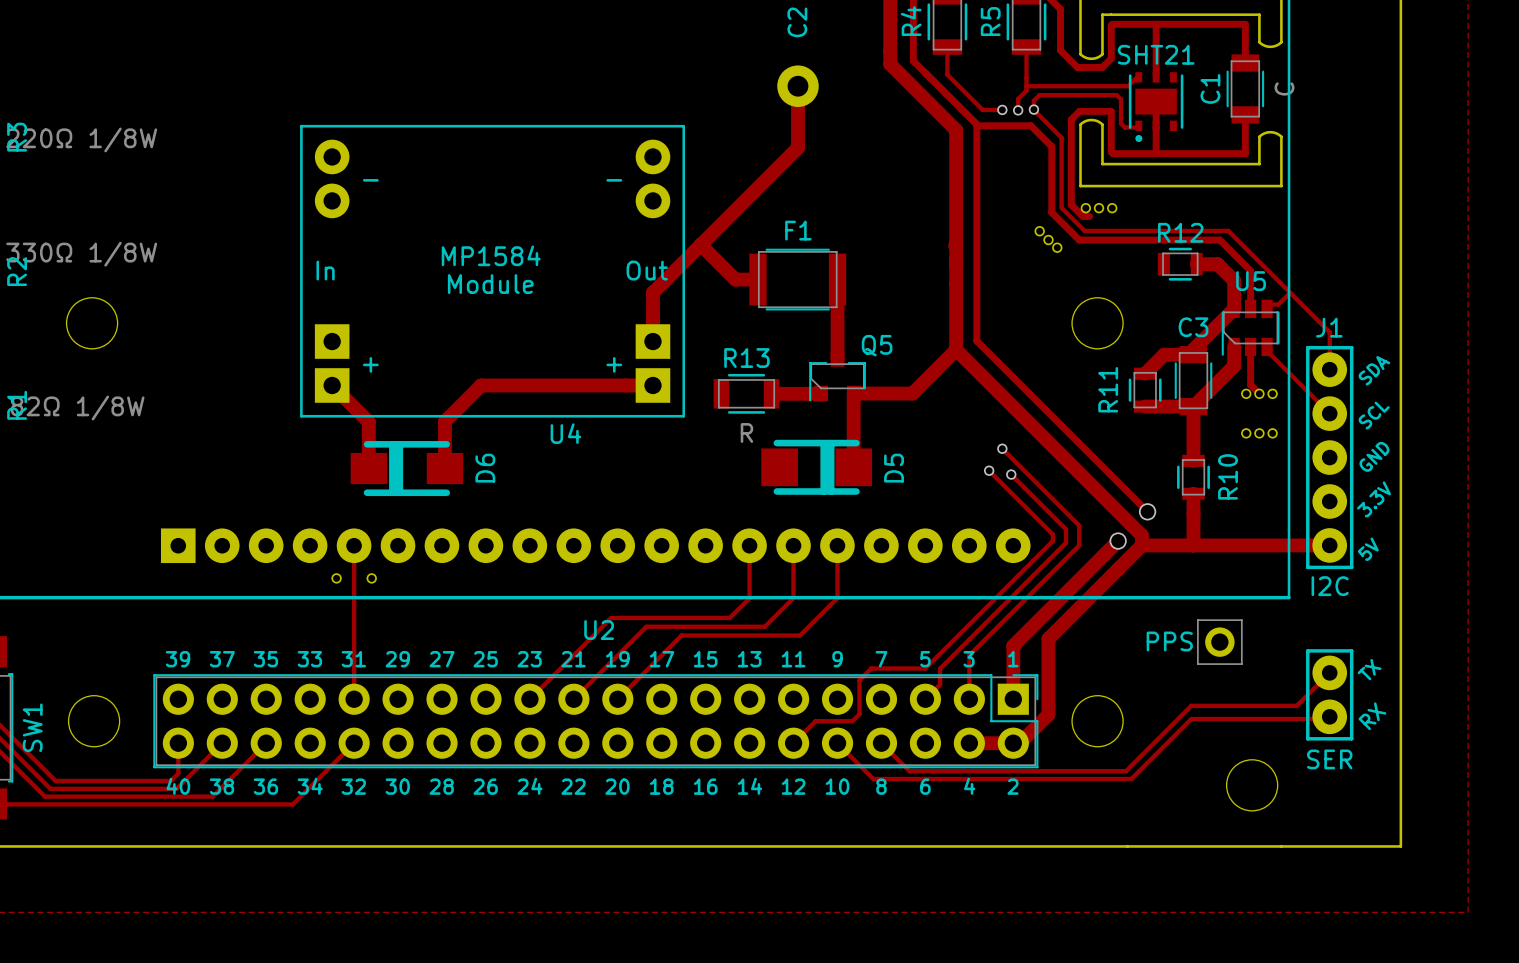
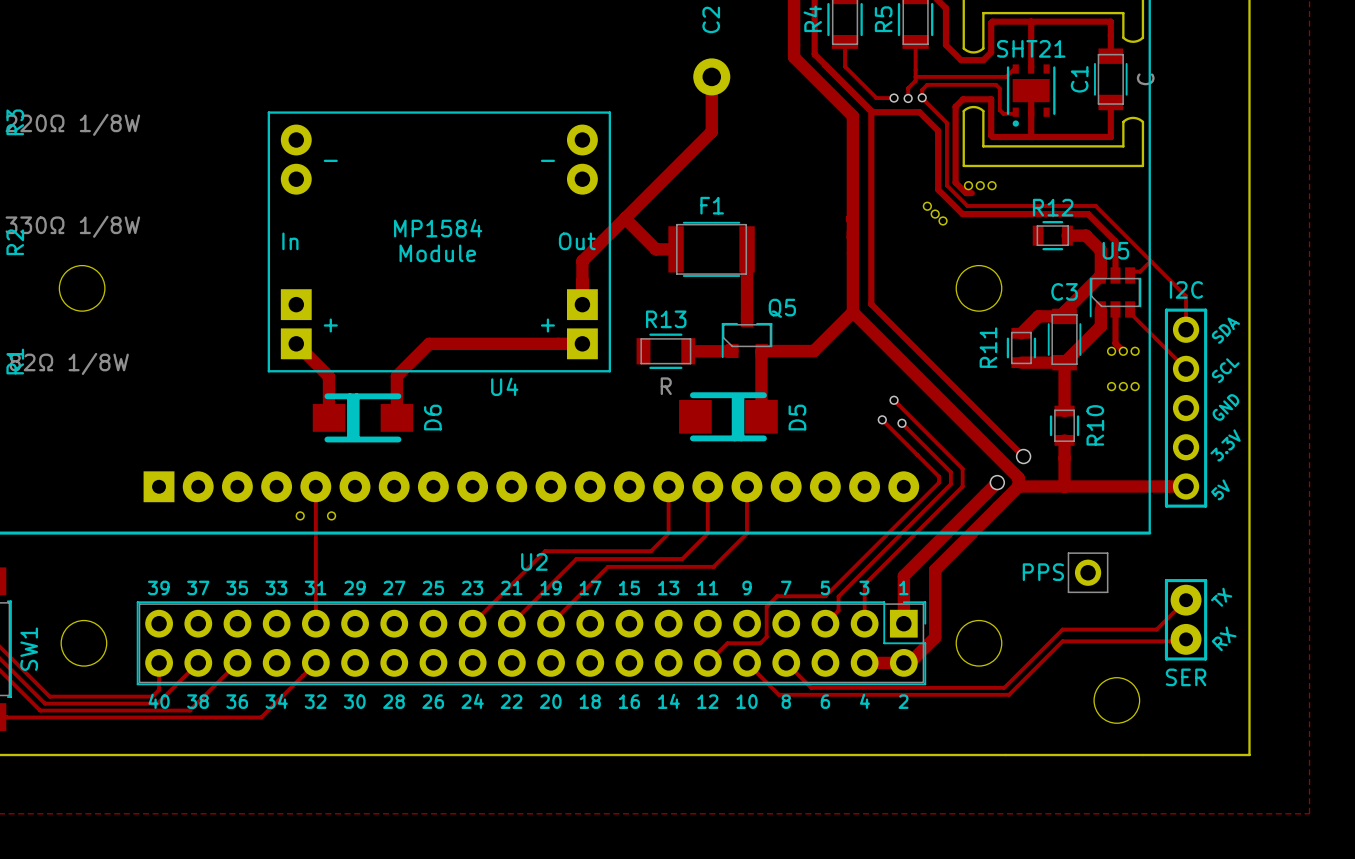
J1: I2C (1329, 457) -> none
part: none -> I2C (1186, 408)

